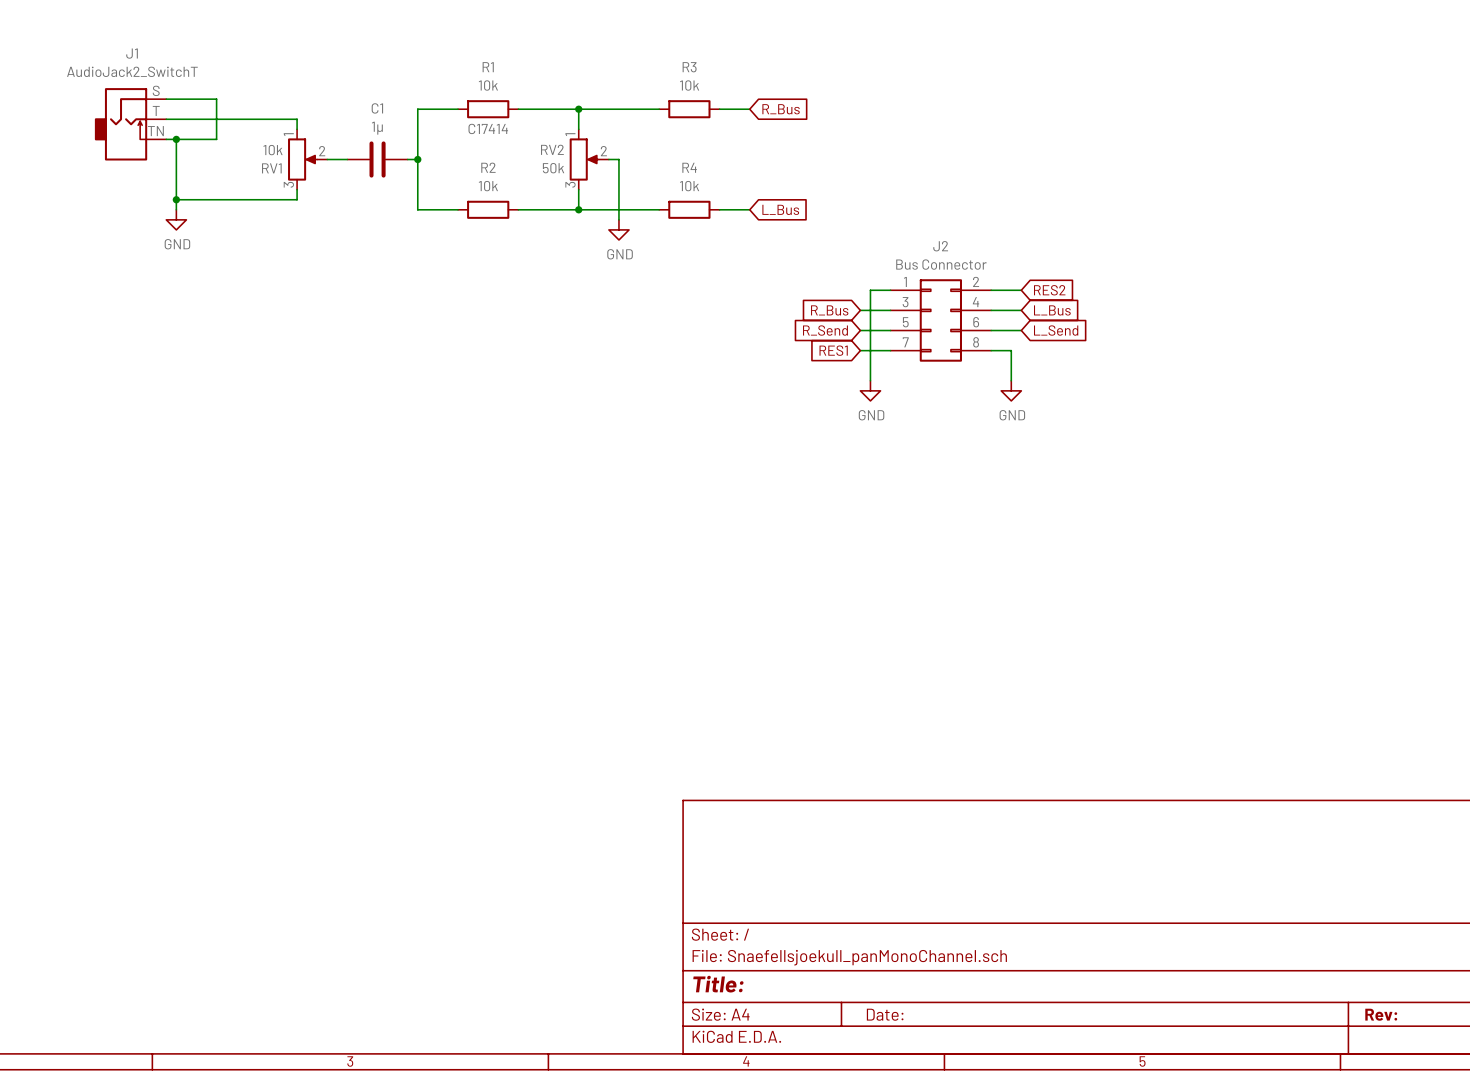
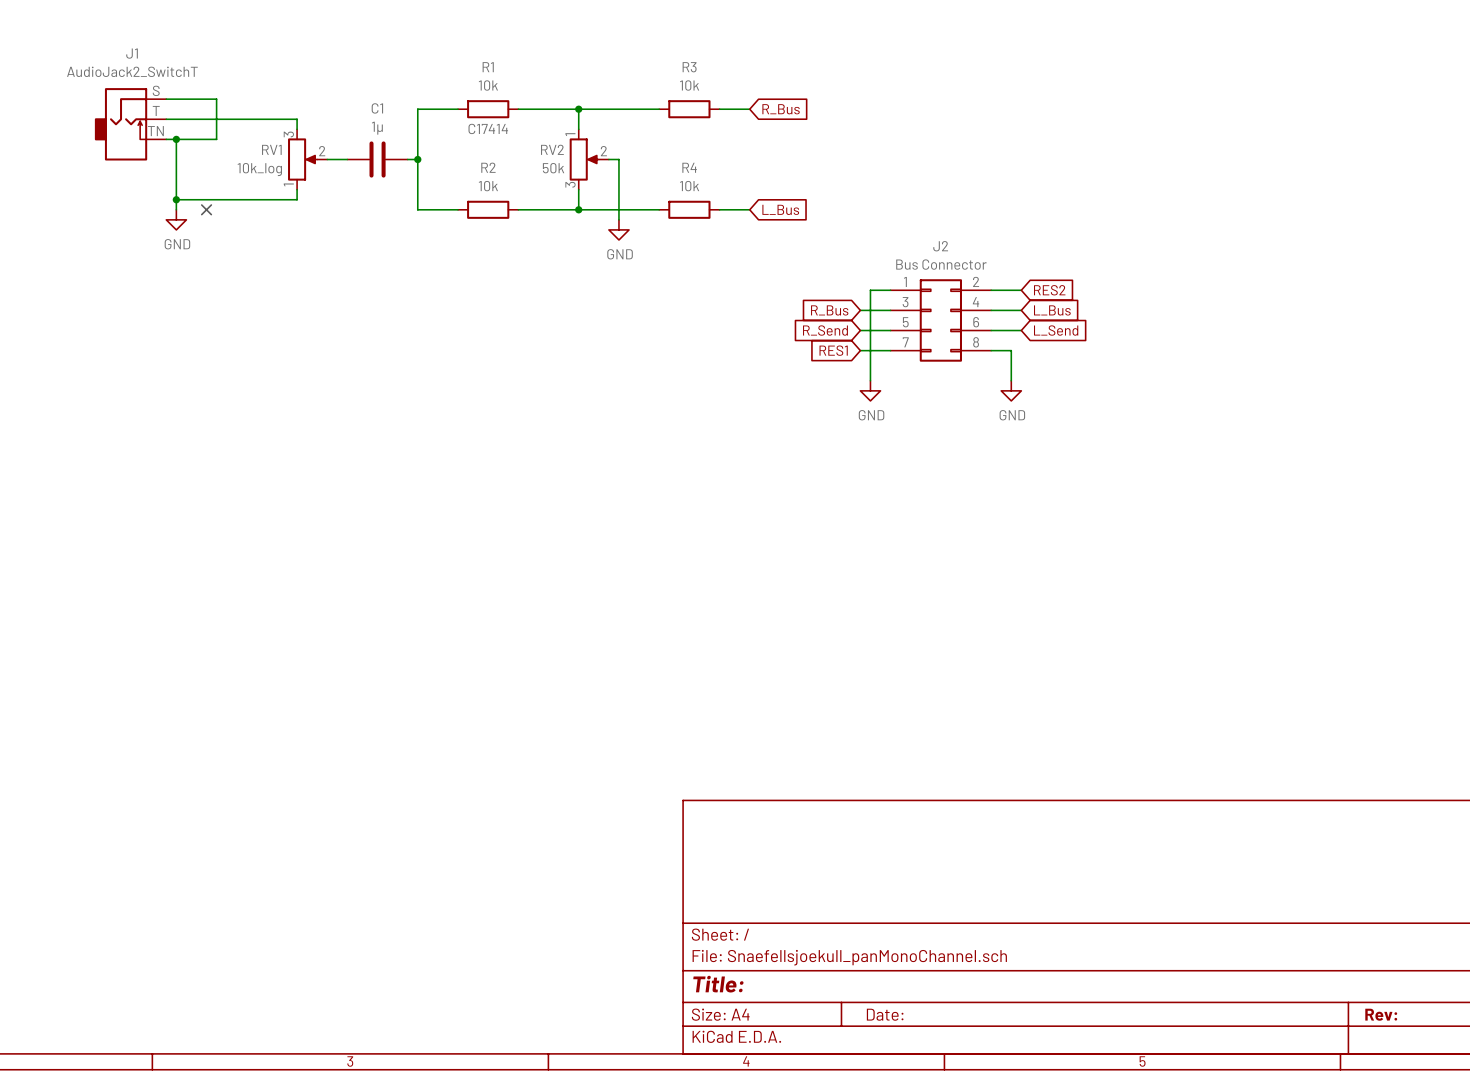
RV1 value: 10k (273, 150) -> 10k_log (259, 169)
RV1 flip: as is (302, 159) -> up-down (302, 159)
no-connect mark: none -> (206, 209)

